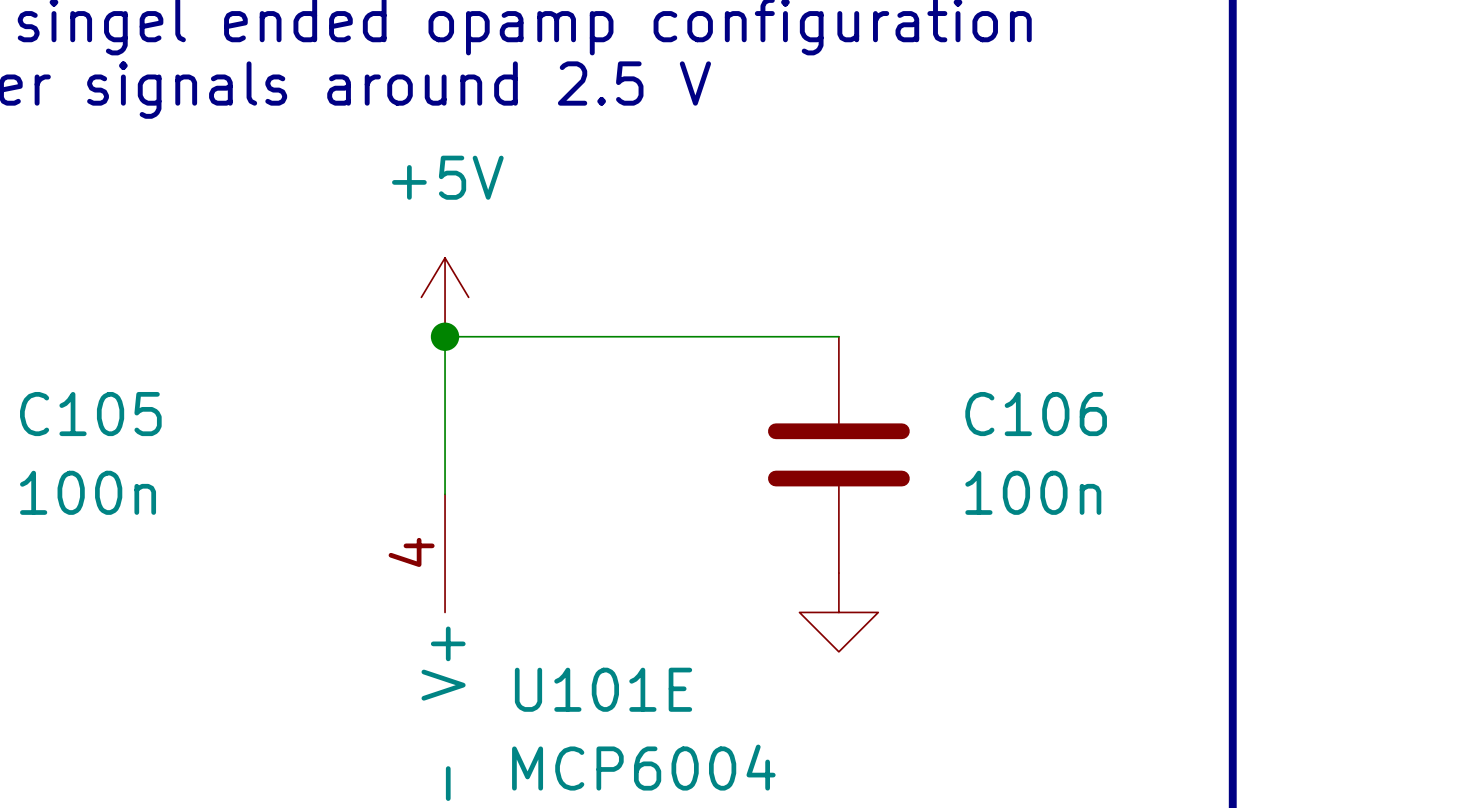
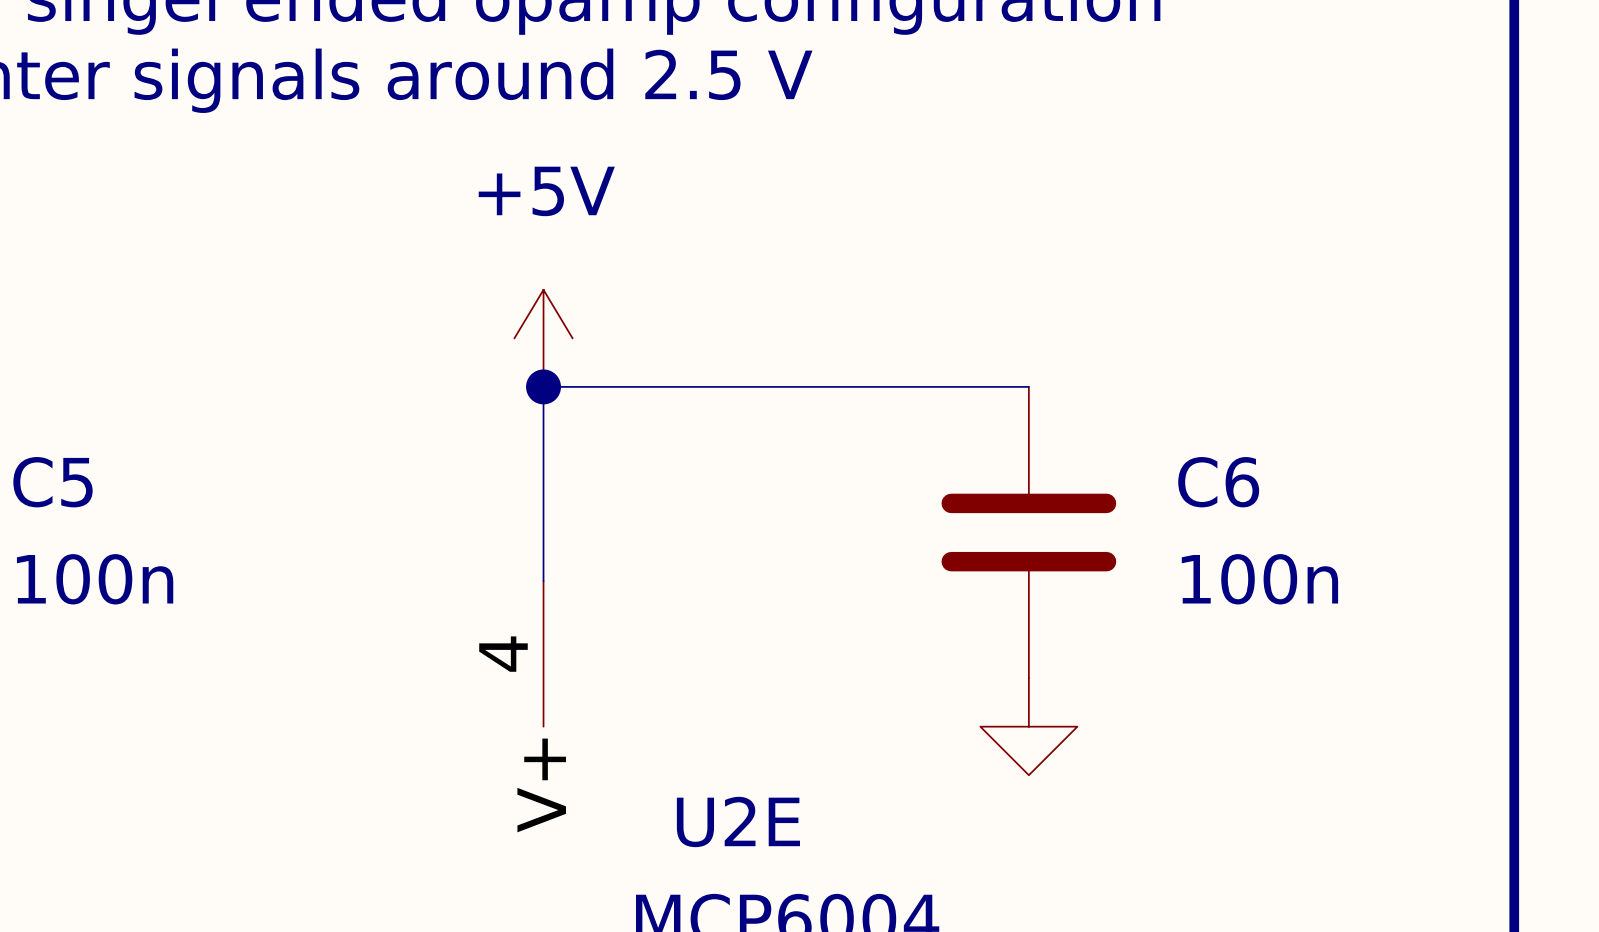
C105 name: C105 (90, 414) -> C5 (53, 482)
C106 name: C106 (1036, 414) -> C6 (1218, 482)
U101E name: U101E (603, 689) -> U2E (738, 821)

